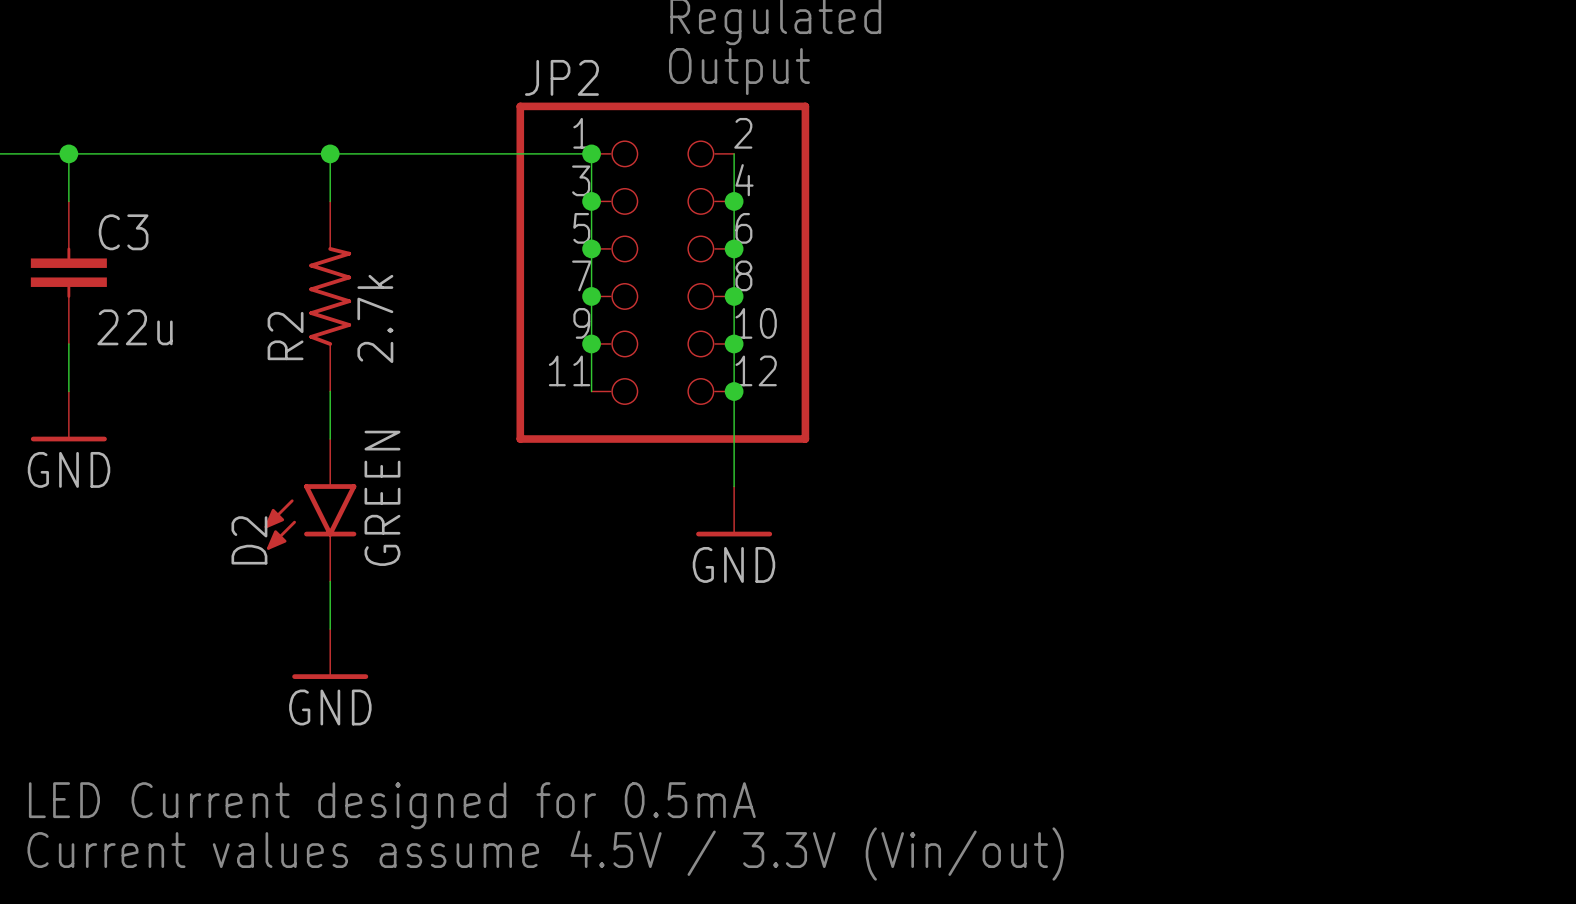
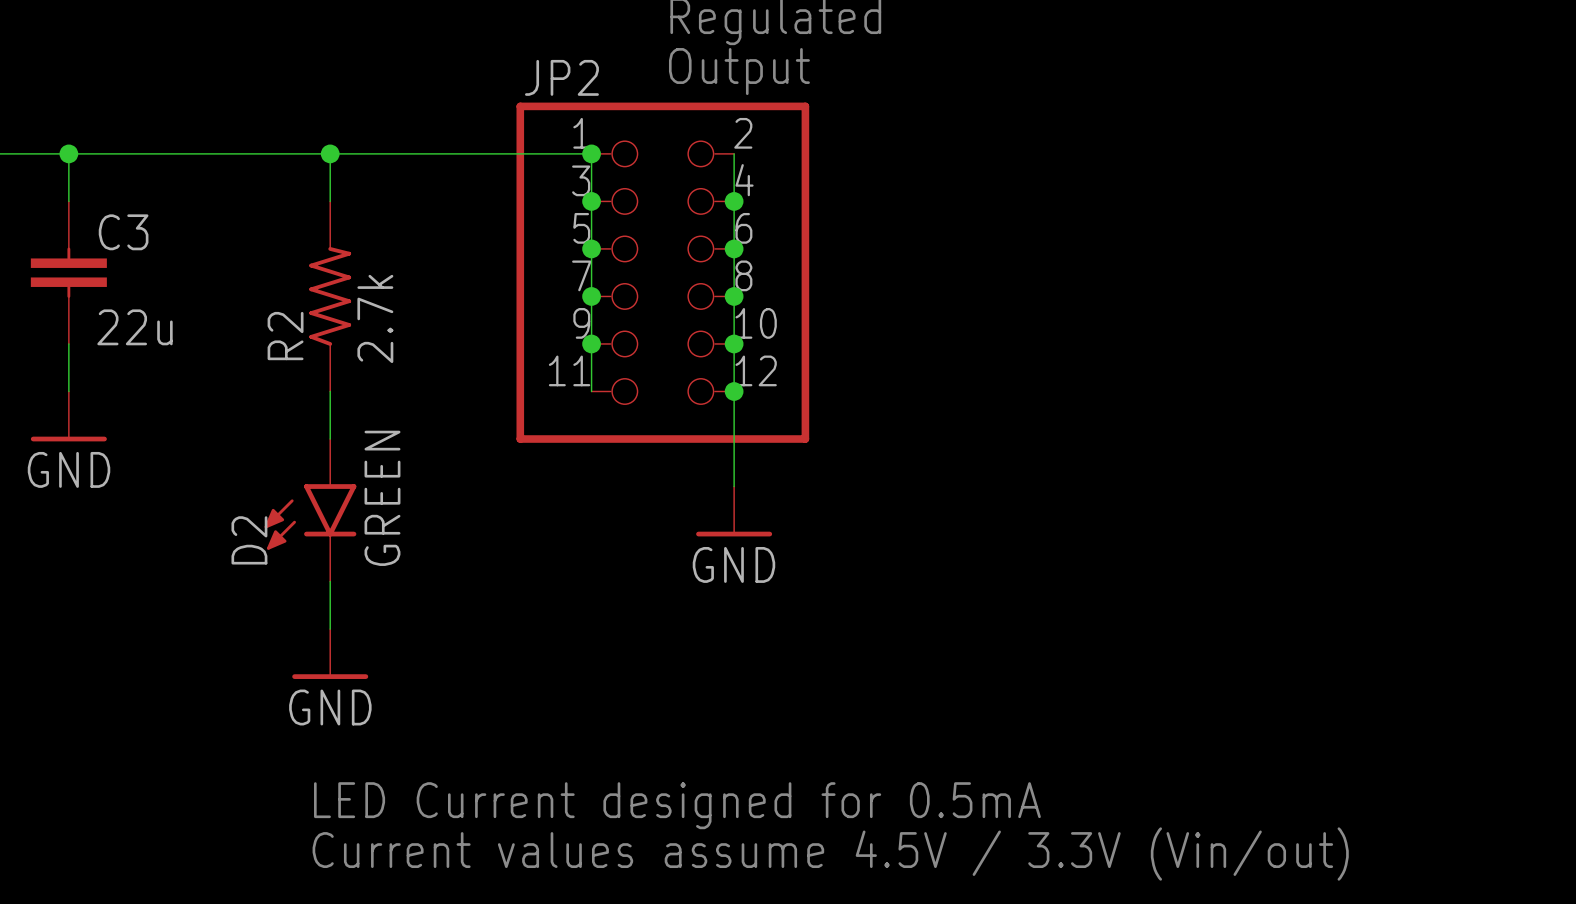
text position: LED Current designed for 0.5mA (392, 805) -> LED Current designed for 0.5mA (677, 805)
text position: Current values assume 4.5V / 3.3V (Vin/out) (545, 854) -> Current values assume 4.5V / 3.3V (Vin/out) (830, 854)

